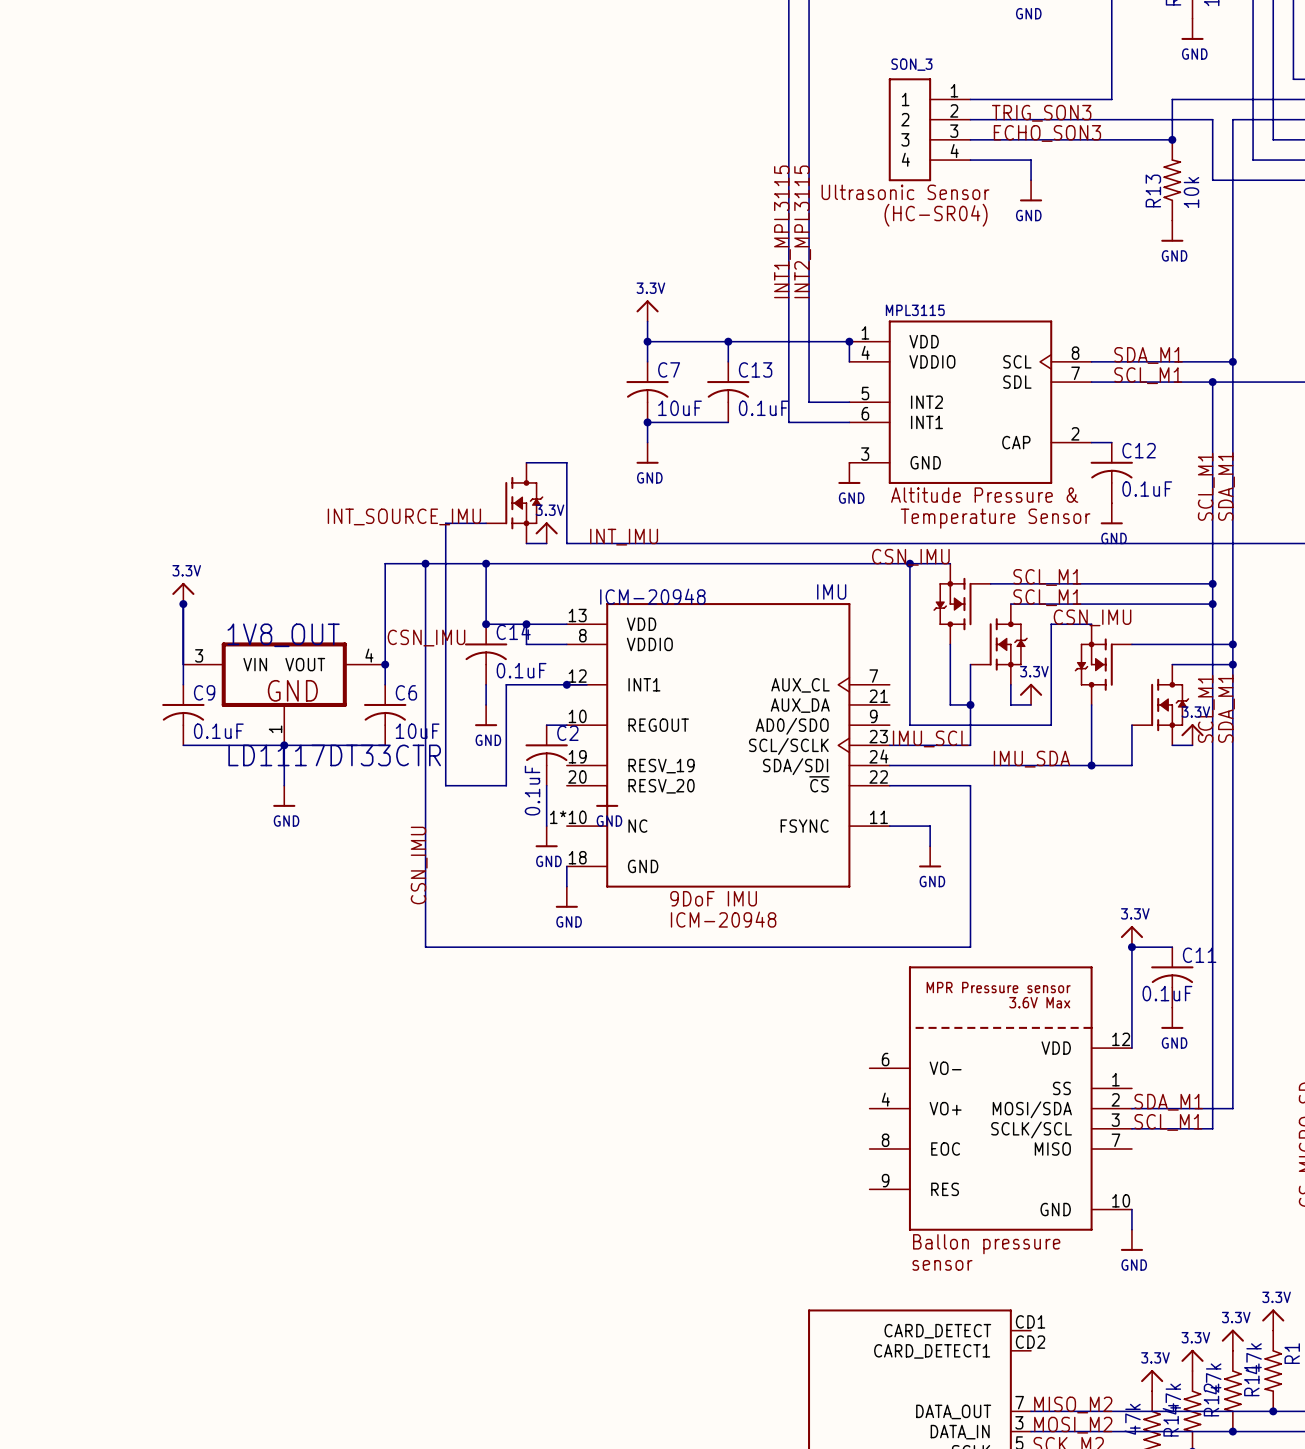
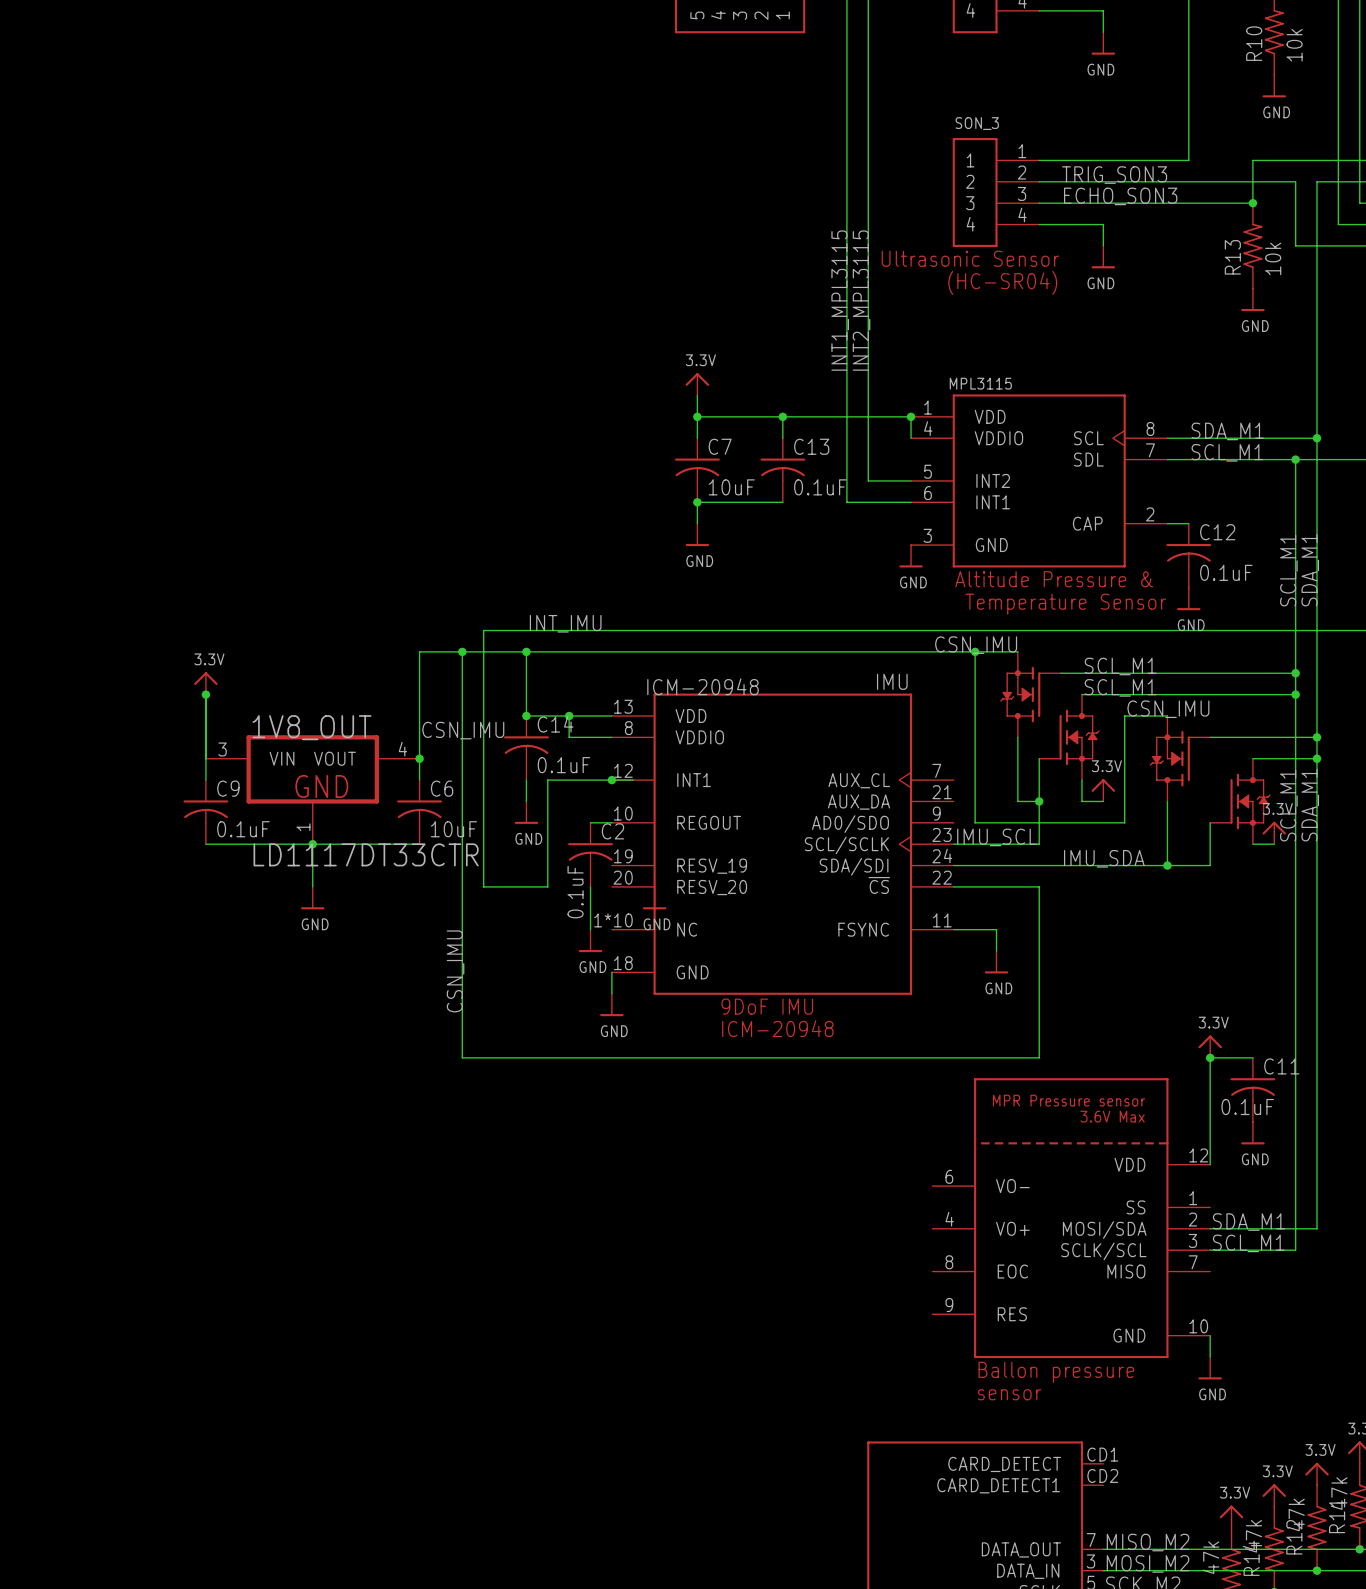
wire: (526, 462) (566, 462) (566, 543) -> (590, 630) (611, 630)
part: (514, 503) -> none
label: INT_SOURCE_IMU (404, 516) -> none
wire: (486, 523) (445, 523) (445, 543) -> (569, 630) (483, 630)
power symbol: 3.3V (546, 532) -> none
label position: INT_IMU (624, 537) -> INT_IMU (565, 623)

